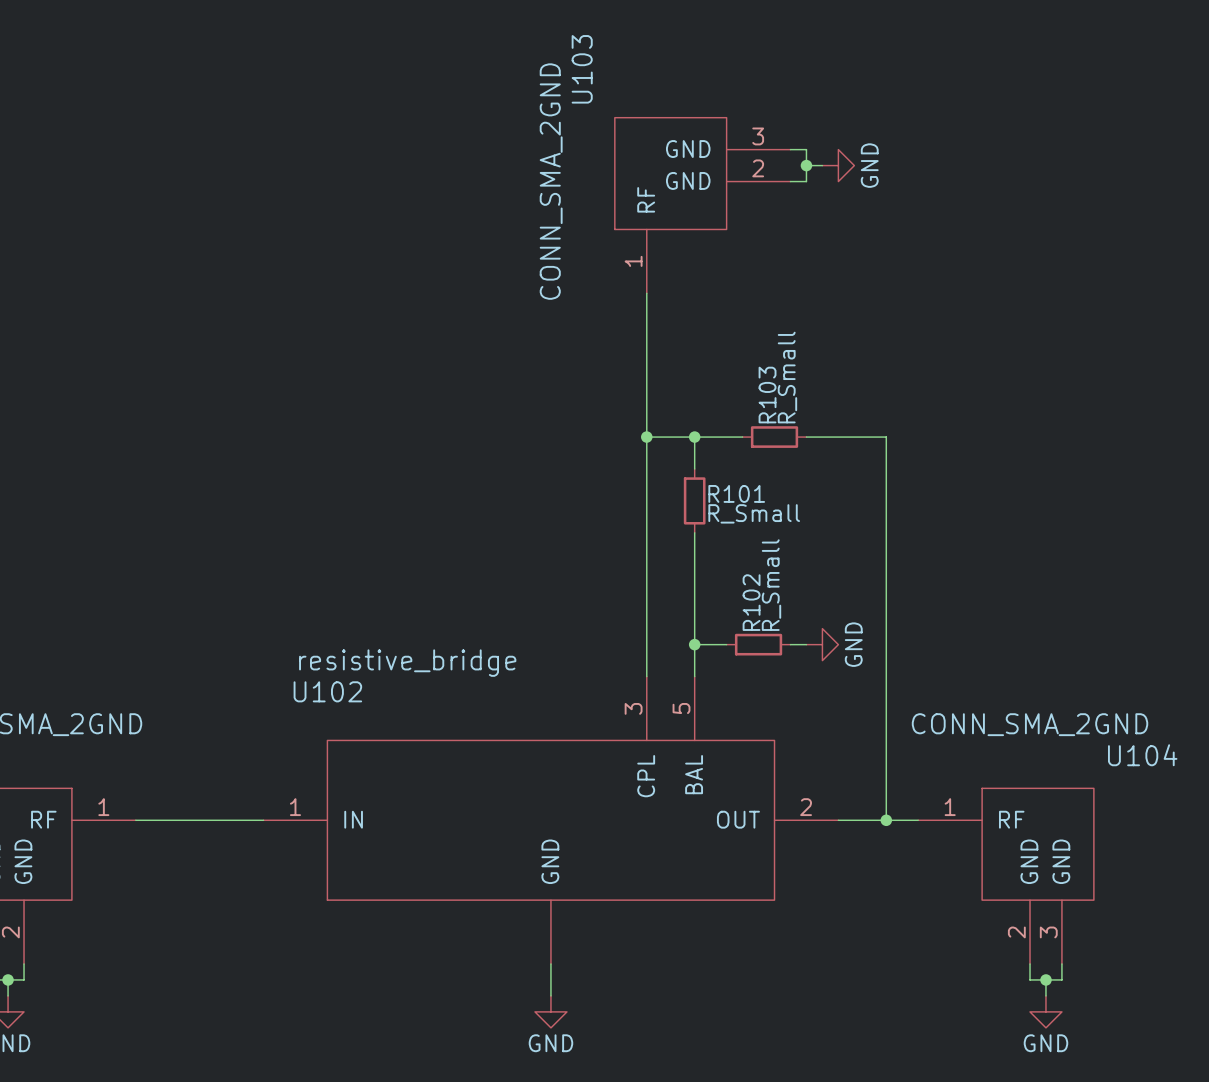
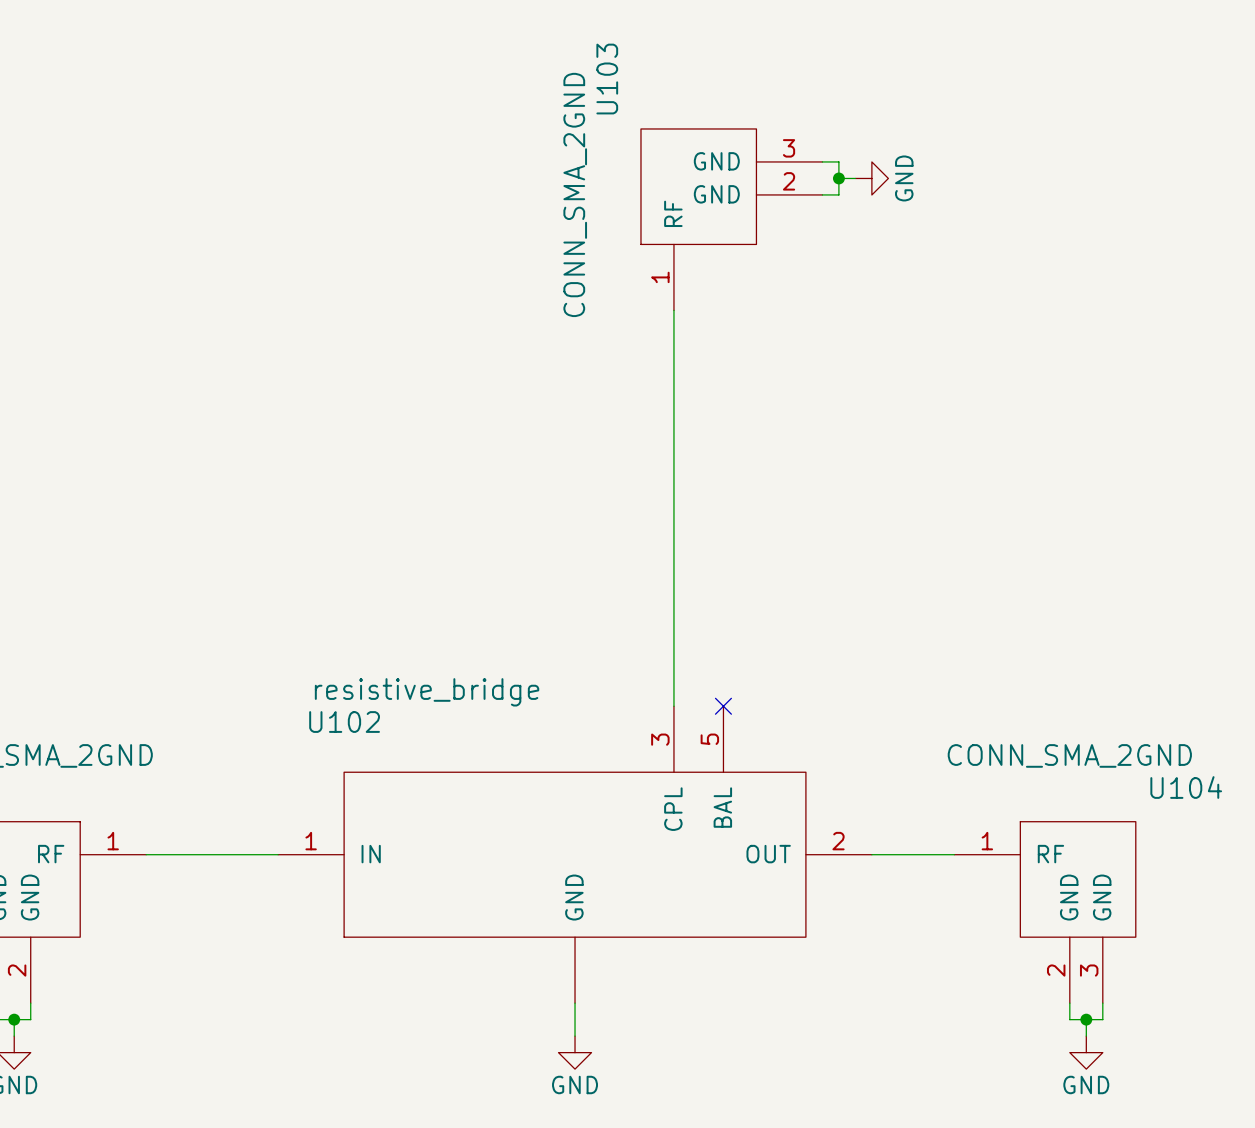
wire: (646, 437) (742, 437) -> none
junction: (646, 437) -> none
wire: (694, 437) (694, 468) -> none
junction: (694, 437) -> none
R103: R_Small (774, 437) -> none
wire: (806, 437) (886, 437) (886, 820) -> none
R101: R_Small (694, 500) -> none
wire: (694, 532) (694, 676) -> none
wire: (694, 644) (726, 644) -> none
junction: (694, 644) -> none
R102: R_Small (758, 644) -> none
wire: (790, 644) (806, 644) -> none
power symbol: GND (822, 644) -> none
no-connect mark: none -> (723, 706)
junction: (886, 820) -> none

